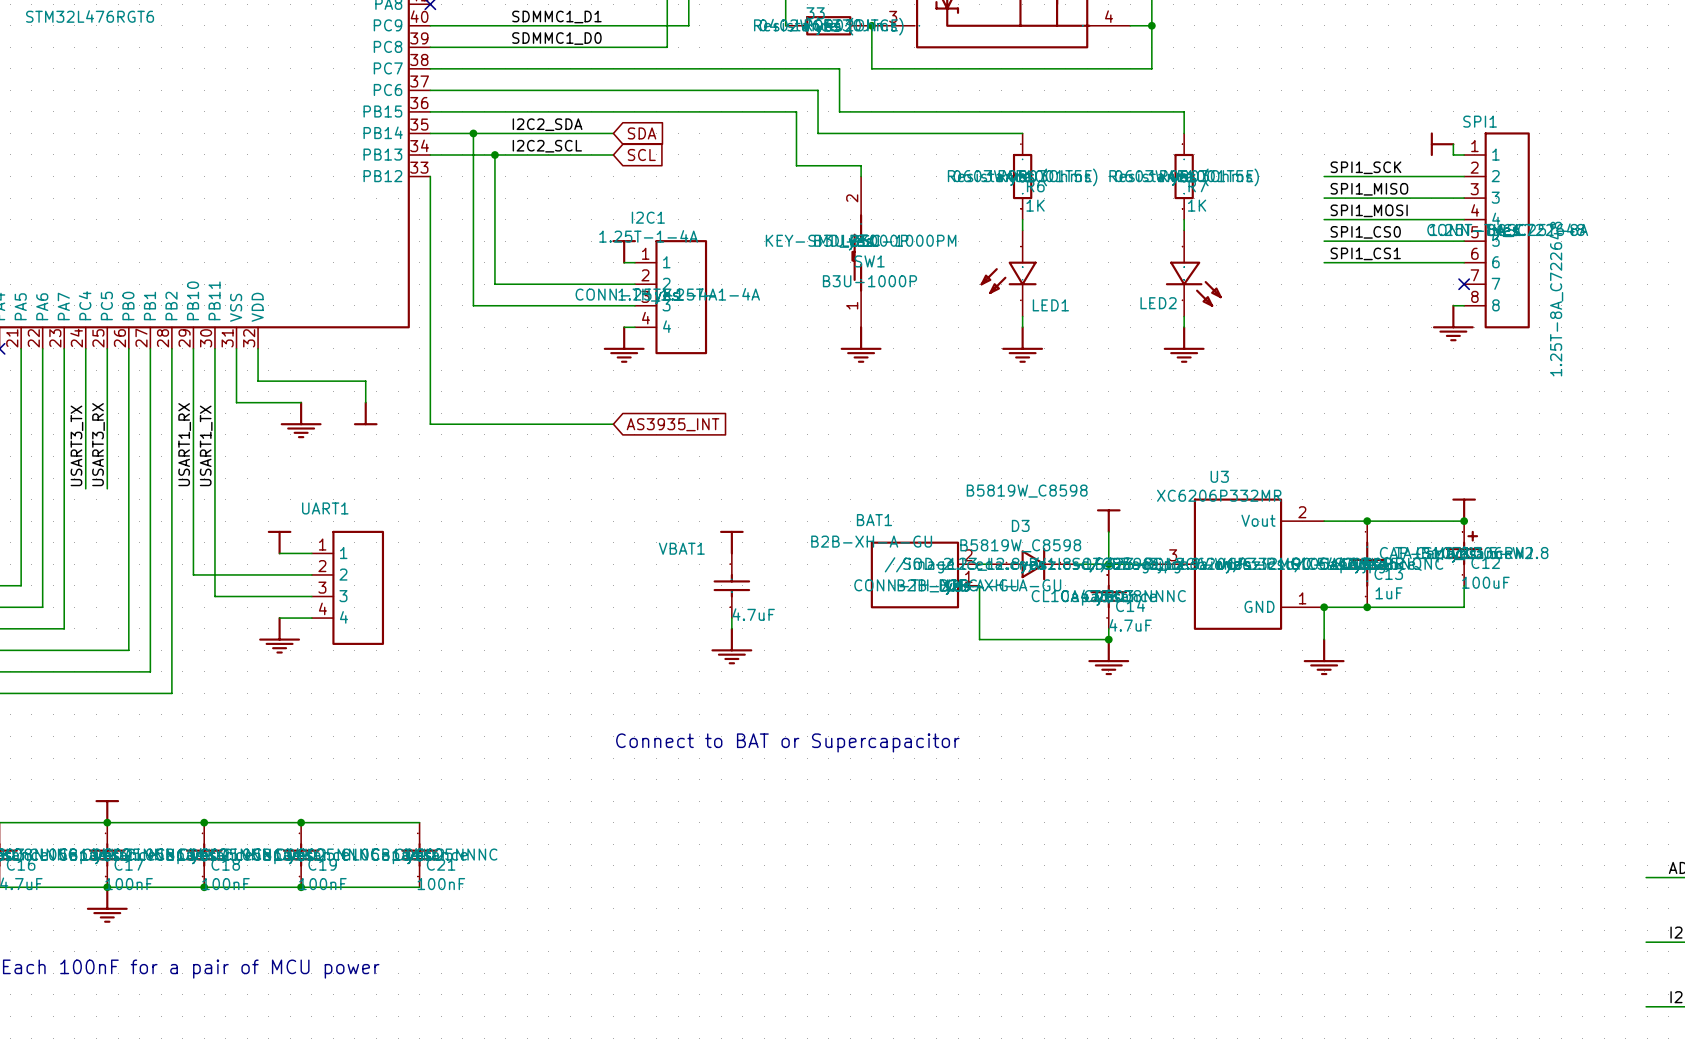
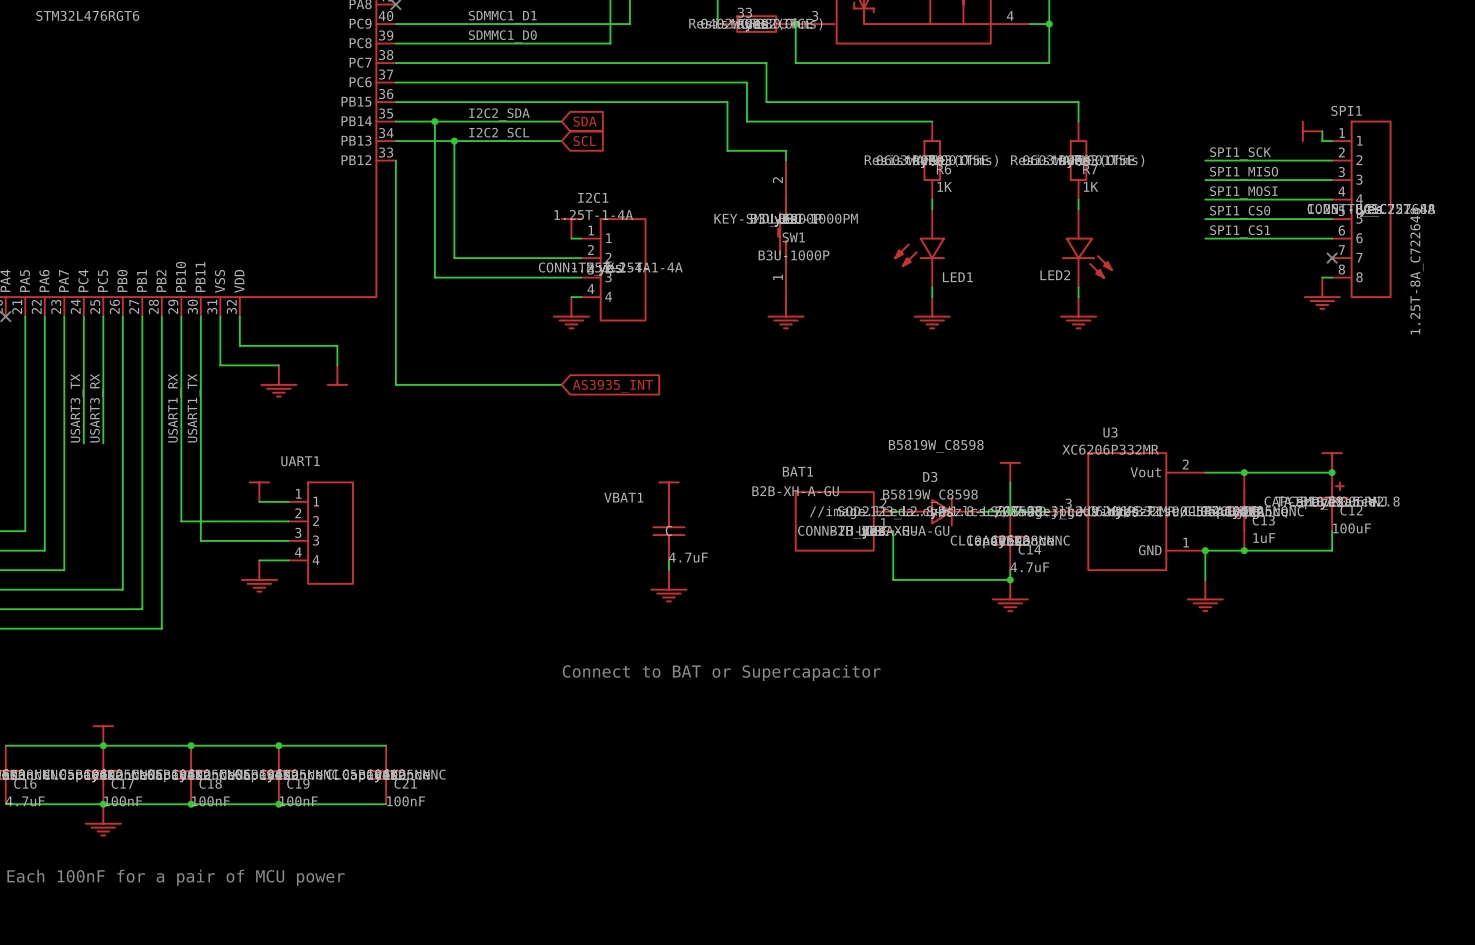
VBAT1 text: none -> C (668, 530)

